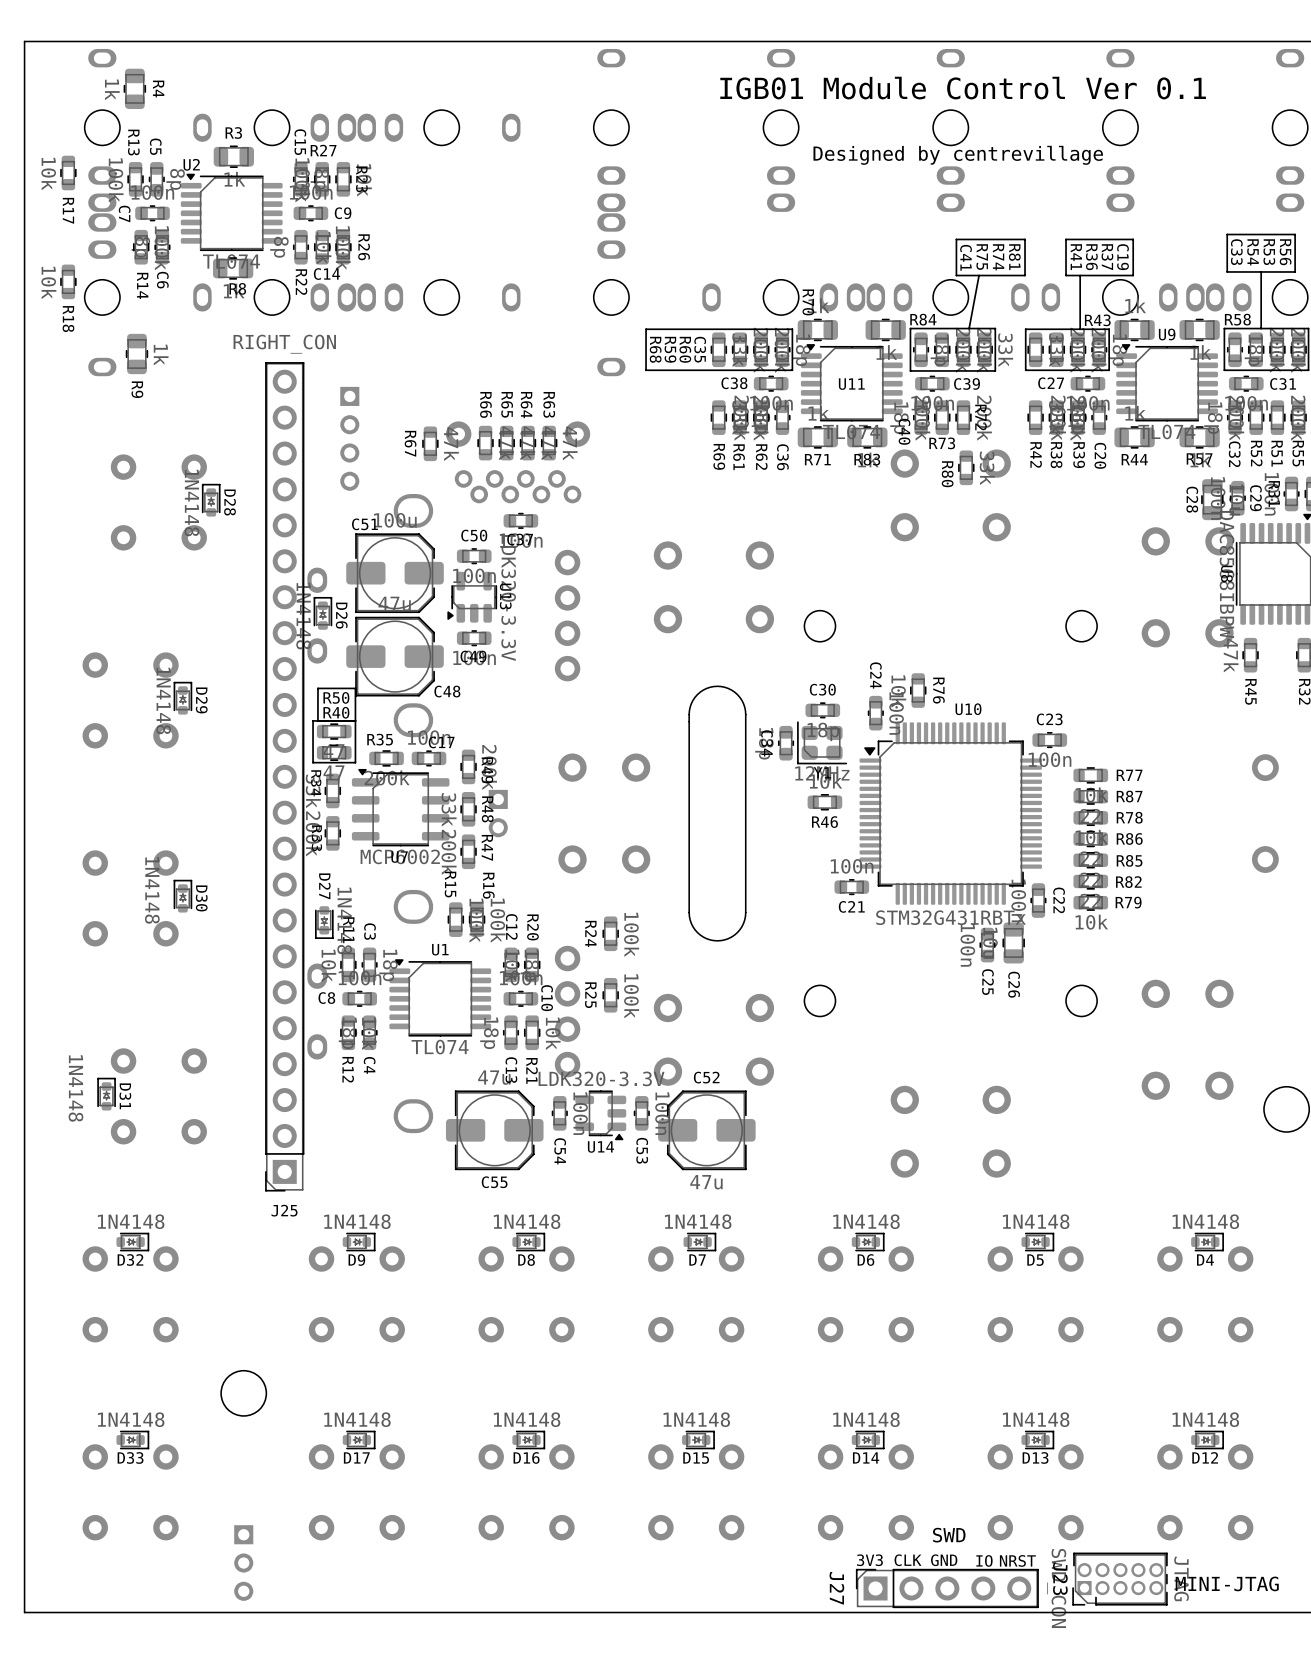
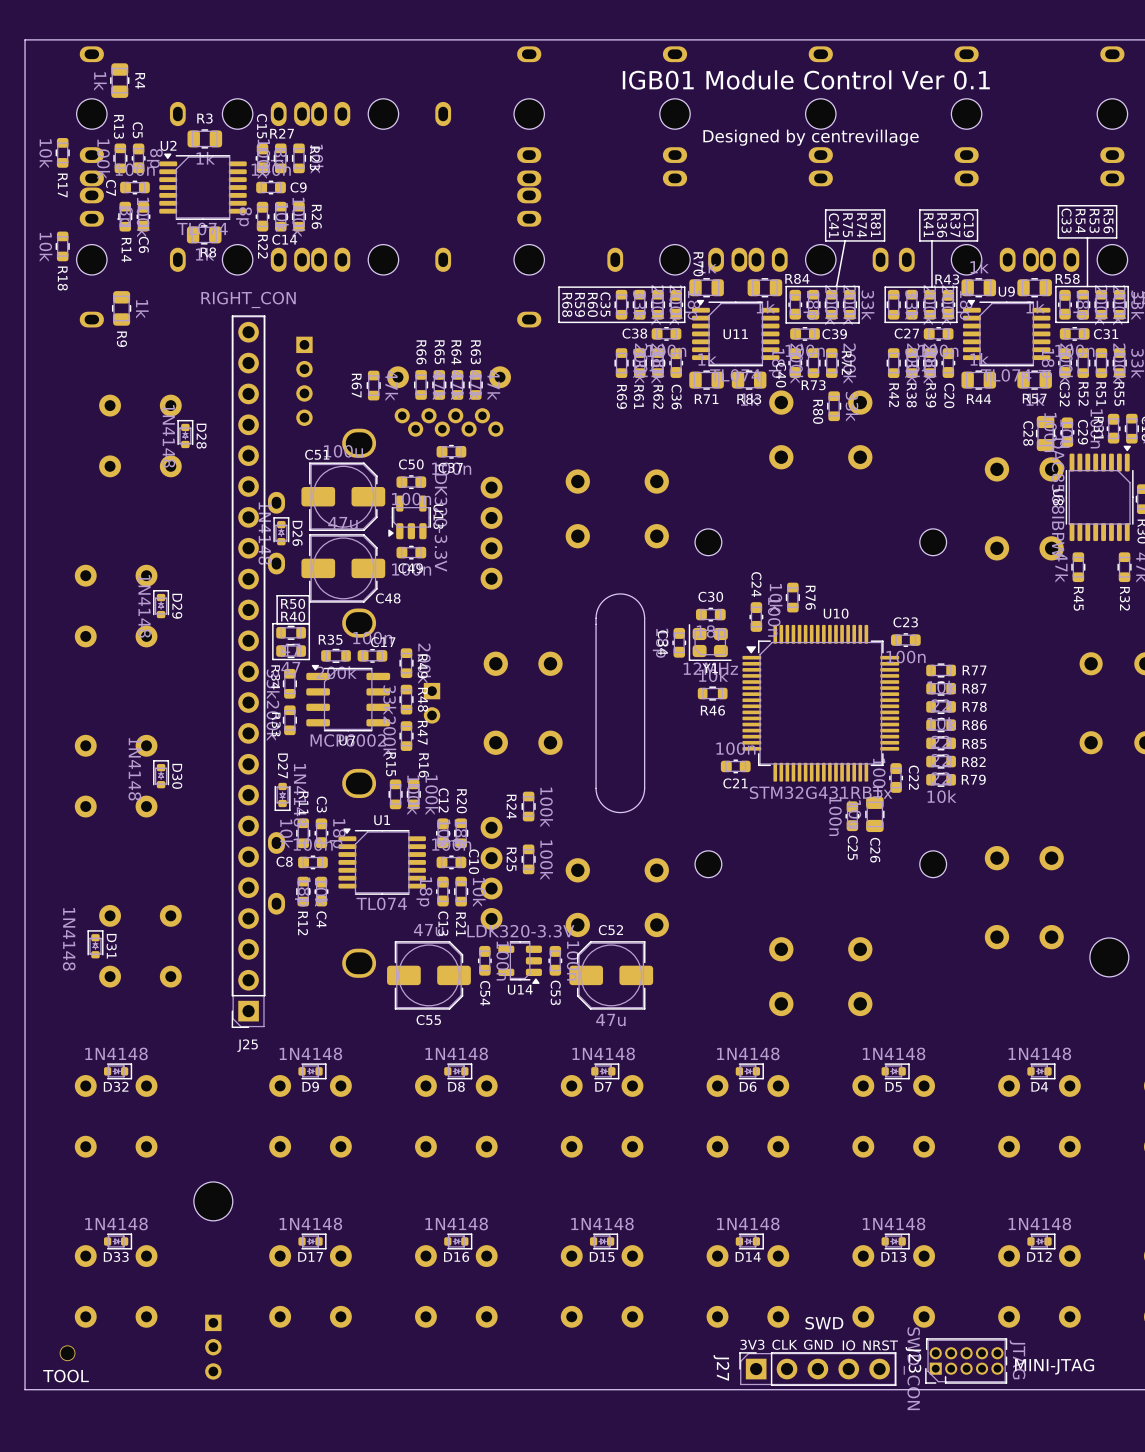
part: none -> (67, 1353)
text: none -> TOOL (66, 1376)

